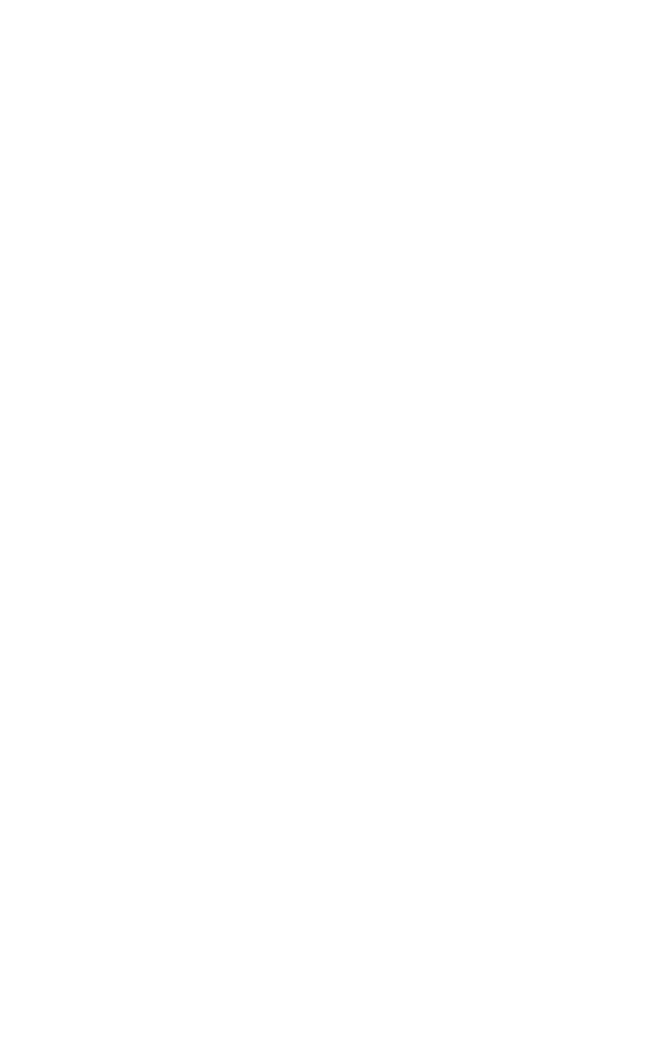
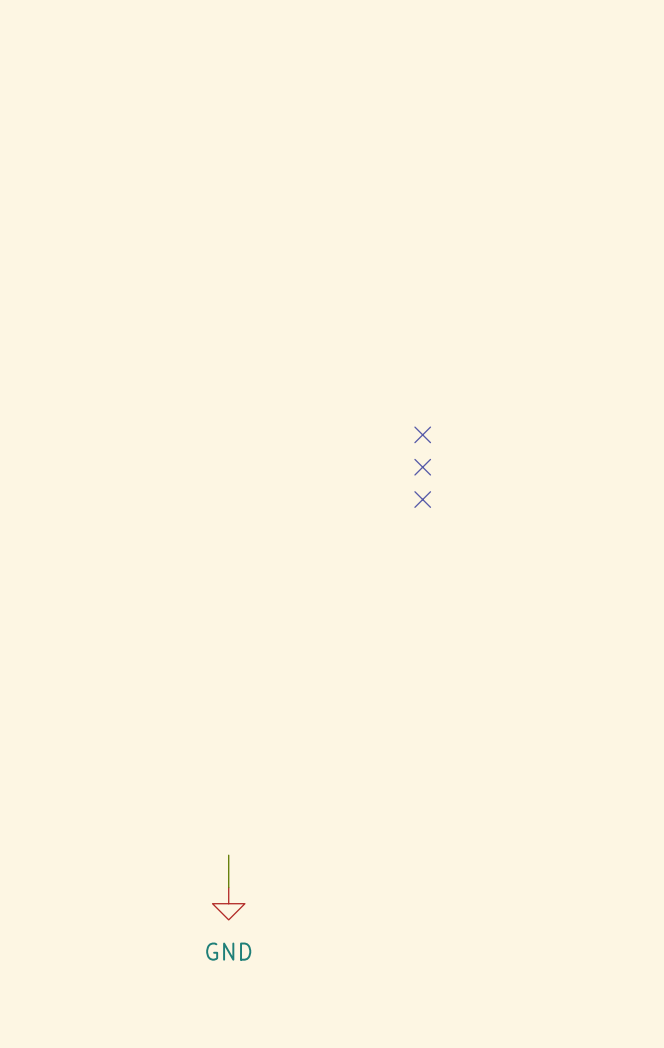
no-connect mark: none -> (422, 434)
no-connect mark: none -> (422, 467)
no-connect mark: none -> (422, 499)
wire: none -> (228, 855) (228, 887)
power symbol: none -> GND (228, 903)

